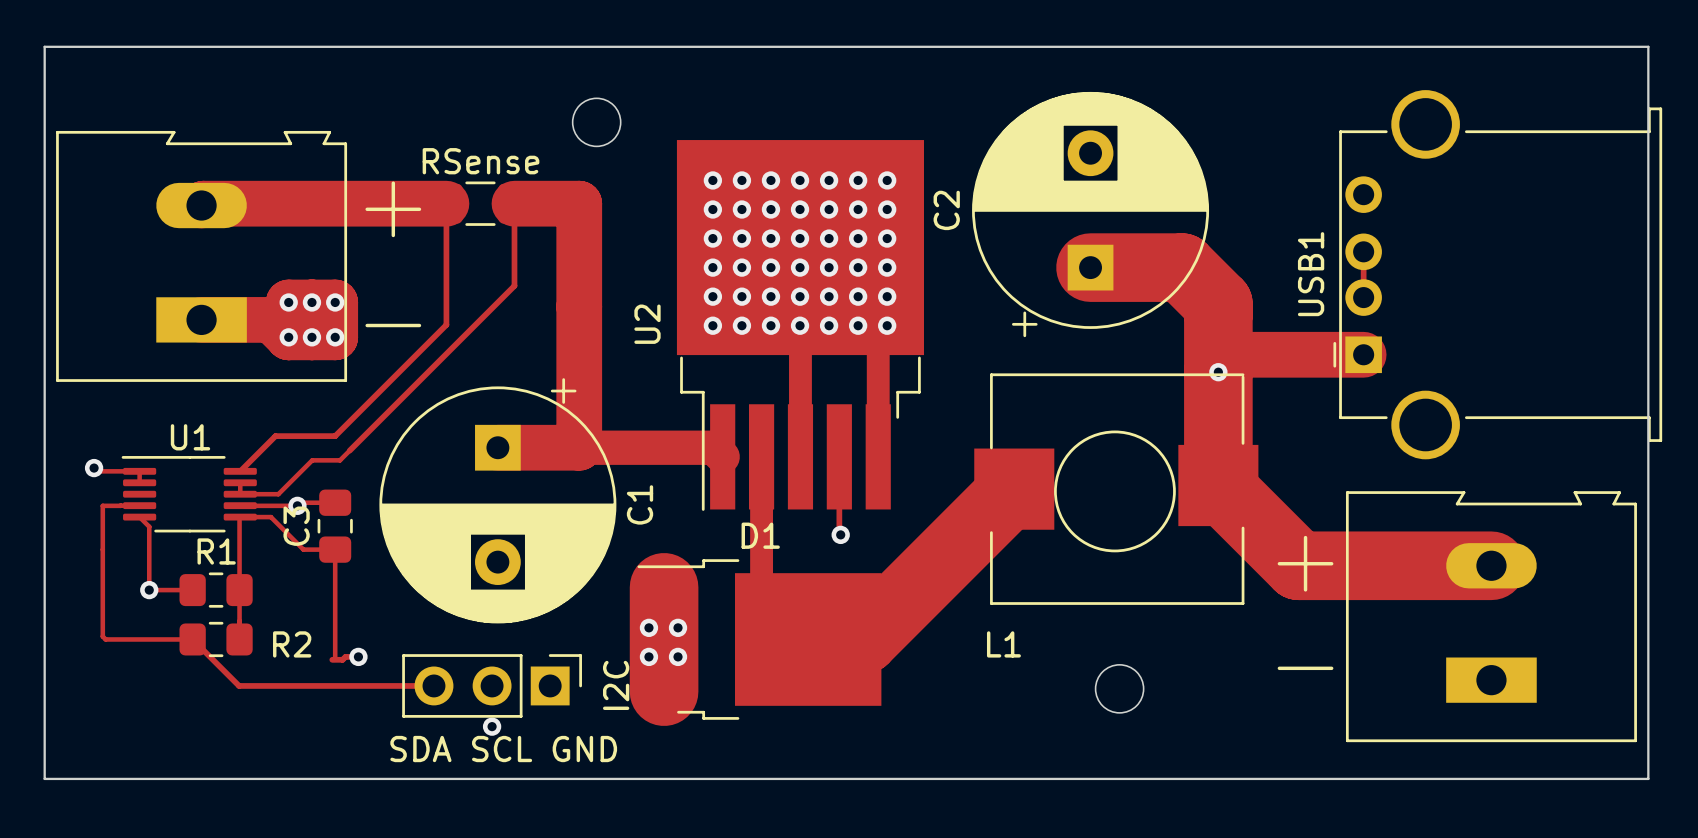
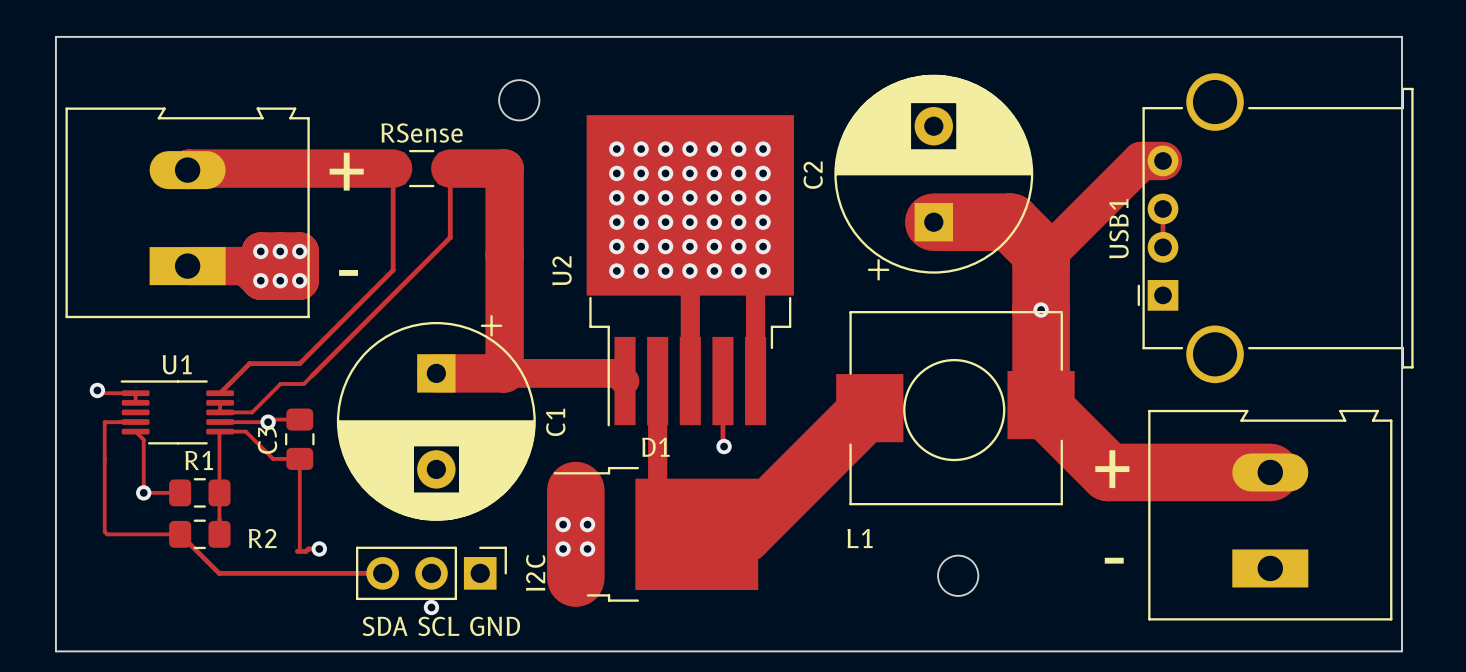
track: none -> (1163, 160) (1141, 160) (1041, 261)
track: (1363, 354) (1235, 354) (1218, 372) -> none

